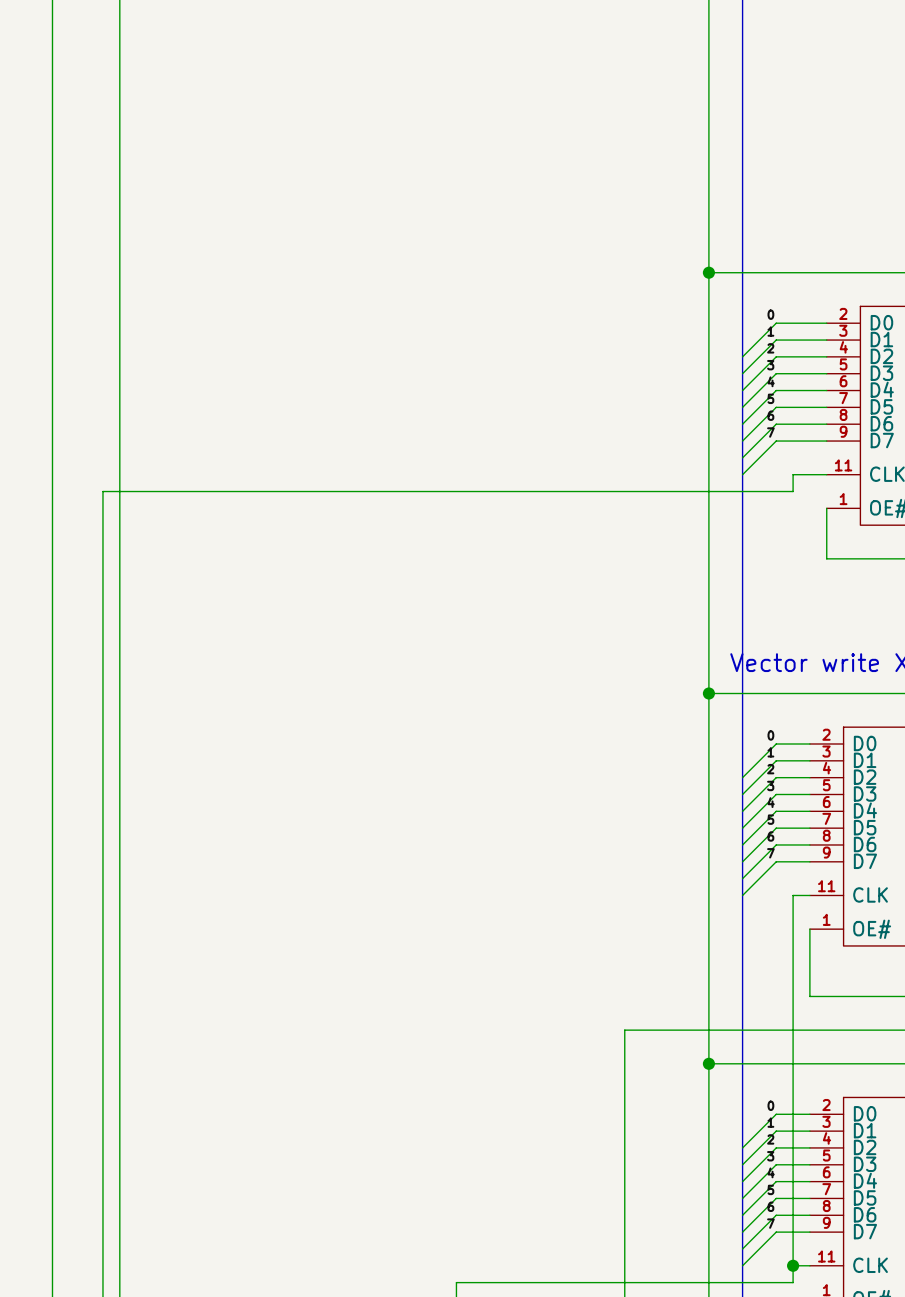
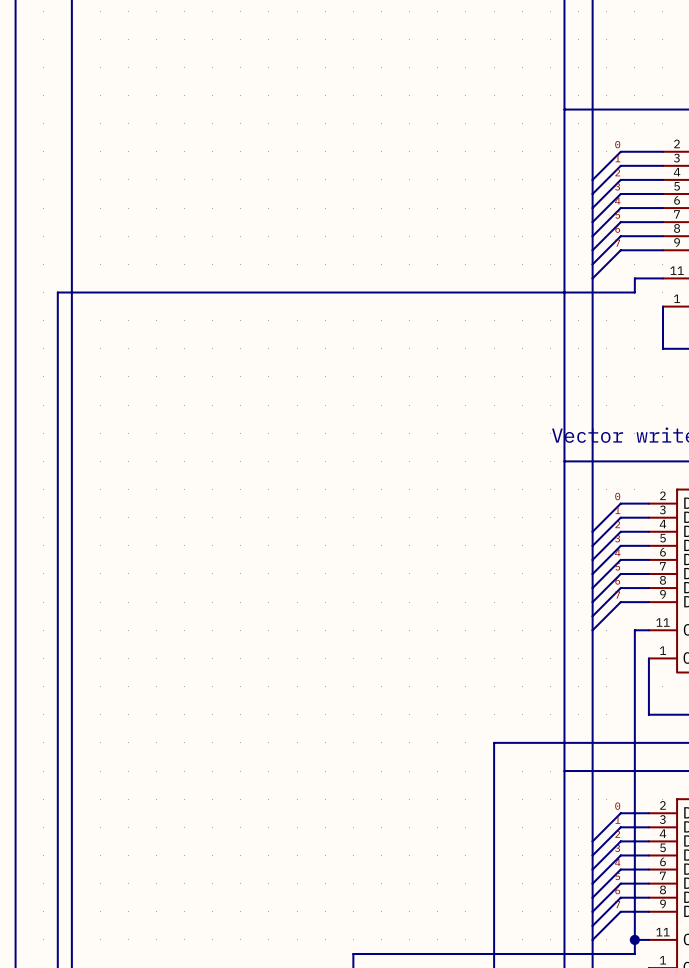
junction: (708, 272) -> none
junction: (708, 693) -> none
junction: (708, 1063) -> none

